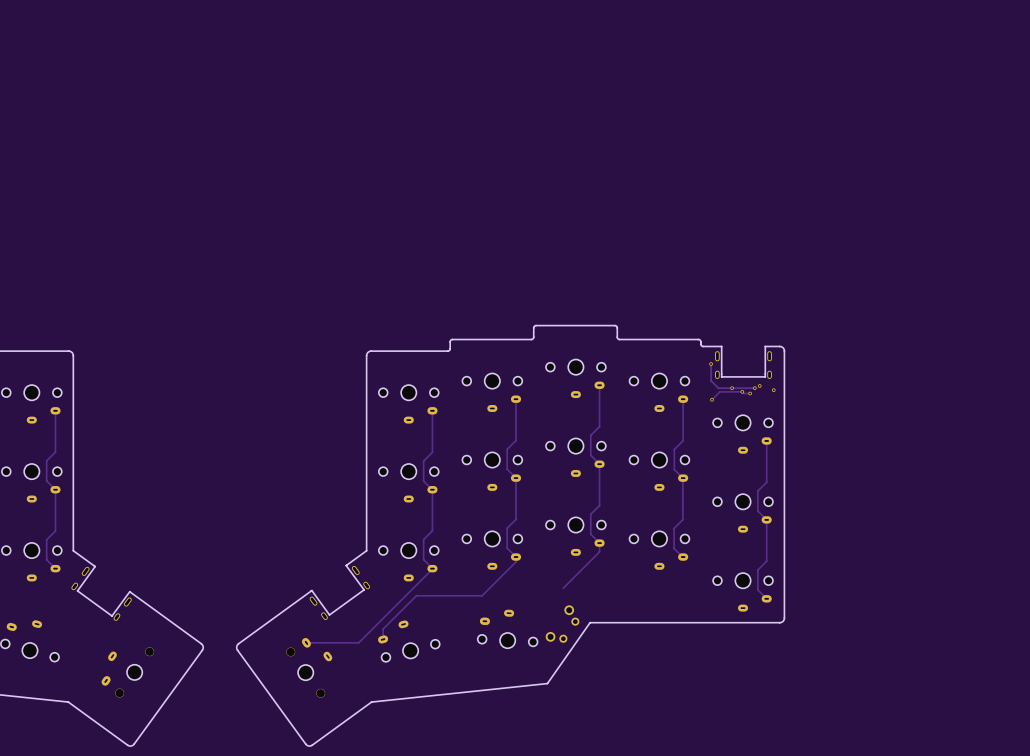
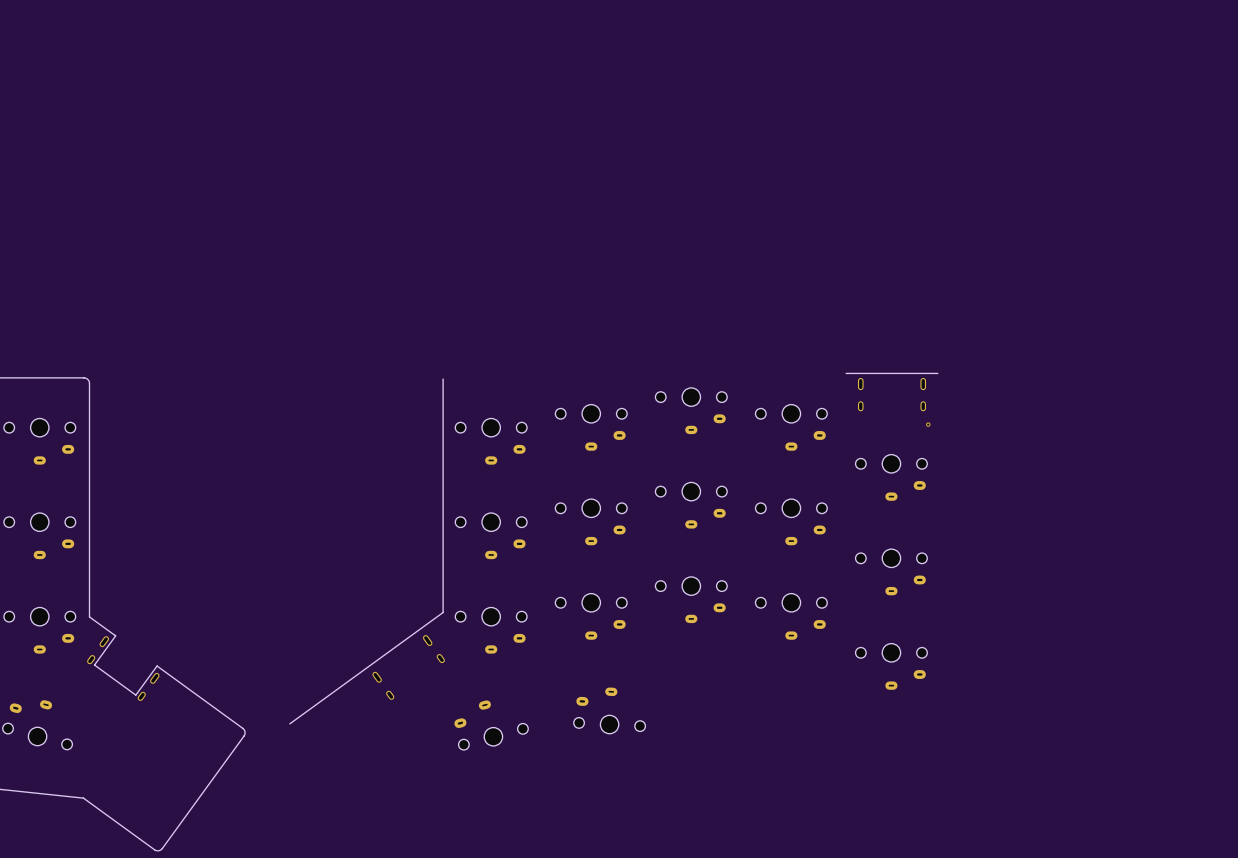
board edge: (614, 325) (535, 325) (531, 339) (452, 339) (448, 351) (371, 351) (367, 353) (366, 550) (346, 565) (364, 589) (329, 614) (311, 590) (236, 646) (306, 745) (312, 745) (371, 702) (547, 683) (590, 622) (779, 622) (783, 620) (783, 348) (780, 346) (765, 346) (765, 376) (721, 376) (721, 346) (702, 346) (698, 339) (619, 339) (617, 327) (614, 325) -> none
board edge: none -> (937, 373) (846, 373)
board edge: none -> (443, 378) (443, 612) (289, 723)
track: (711, 364) (711, 380) (718, 388) (754, 388) -> none
via: (711, 364) -> none
track: (599, 385) (599, 426) (590, 435) (590, 455) (599, 464) (599, 505) (590, 514) (590, 534) (599, 543) (599, 551) (563, 588) -> none
via: (759, 385) -> none
via: (732, 388) -> none
via: (754, 388) -> none
via: (742, 391) -> none
track: (750, 393) (719, 391) (712, 399) -> none
via: (750, 393) -> none
track: (516, 399) (516, 440) (507, 449) (507, 469) (516, 478) (516, 519) (507, 528) (507, 548) (516, 557) (516, 561) (482, 595) (416, 595) (383, 629) (383, 639) -> none
track: (683, 399) (683, 440) (674, 449) (674, 469) (683, 478) -> none
via: (712, 399) -> none
track: (55, 410) (55, 452) (46, 460) (46, 480) (55, 489) (55, 531) (46, 539) (46, 559) (55, 568) -> none
track: (432, 411) (432, 452) (423, 461) (423, 481) (432, 489) -> none
track: (766, 440) (766, 482) (757, 491) (757, 511) (766, 519) (766, 561) (757, 570) (757, 589) (766, 598) -> none
track: (682, 478) (682, 519) (674, 528) (674, 548) (682, 557) -> none
track: (432, 489) (432, 530) (423, 539) (423, 559) (432, 568) -> none
track: (432, 568) (358, 642) (306, 642) -> none
part: (562, 624) -> none
part: (309, 667) -> none
part: (127, 672) -> none

